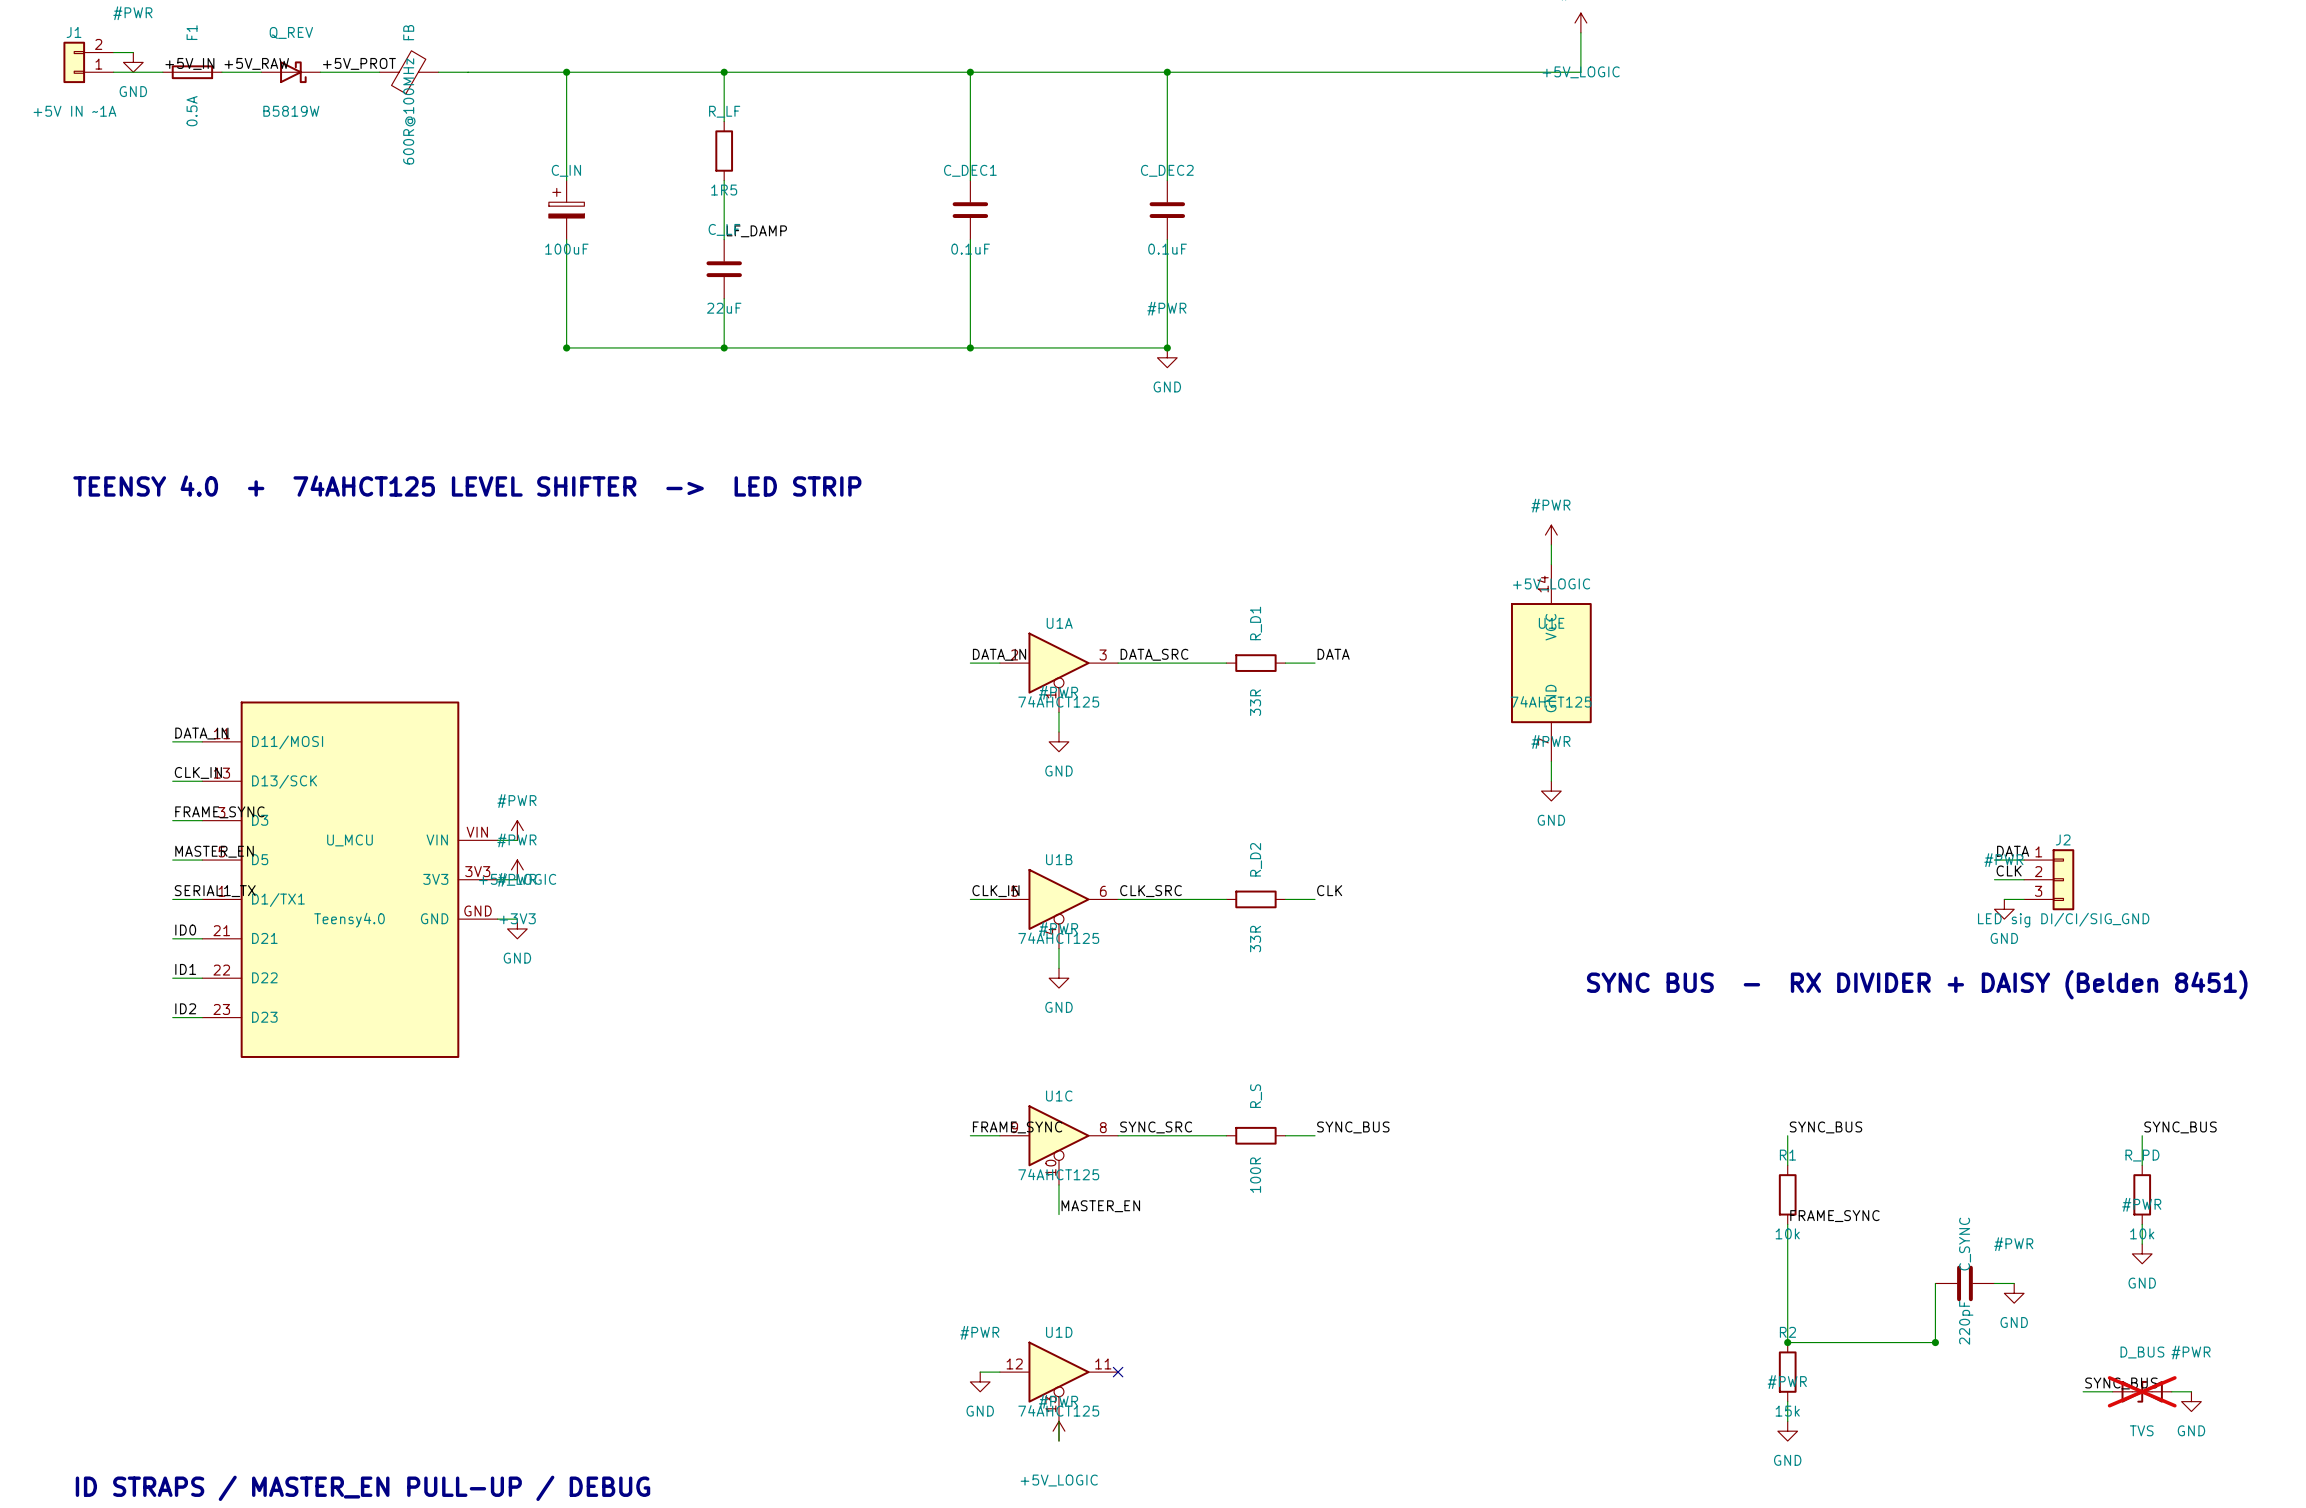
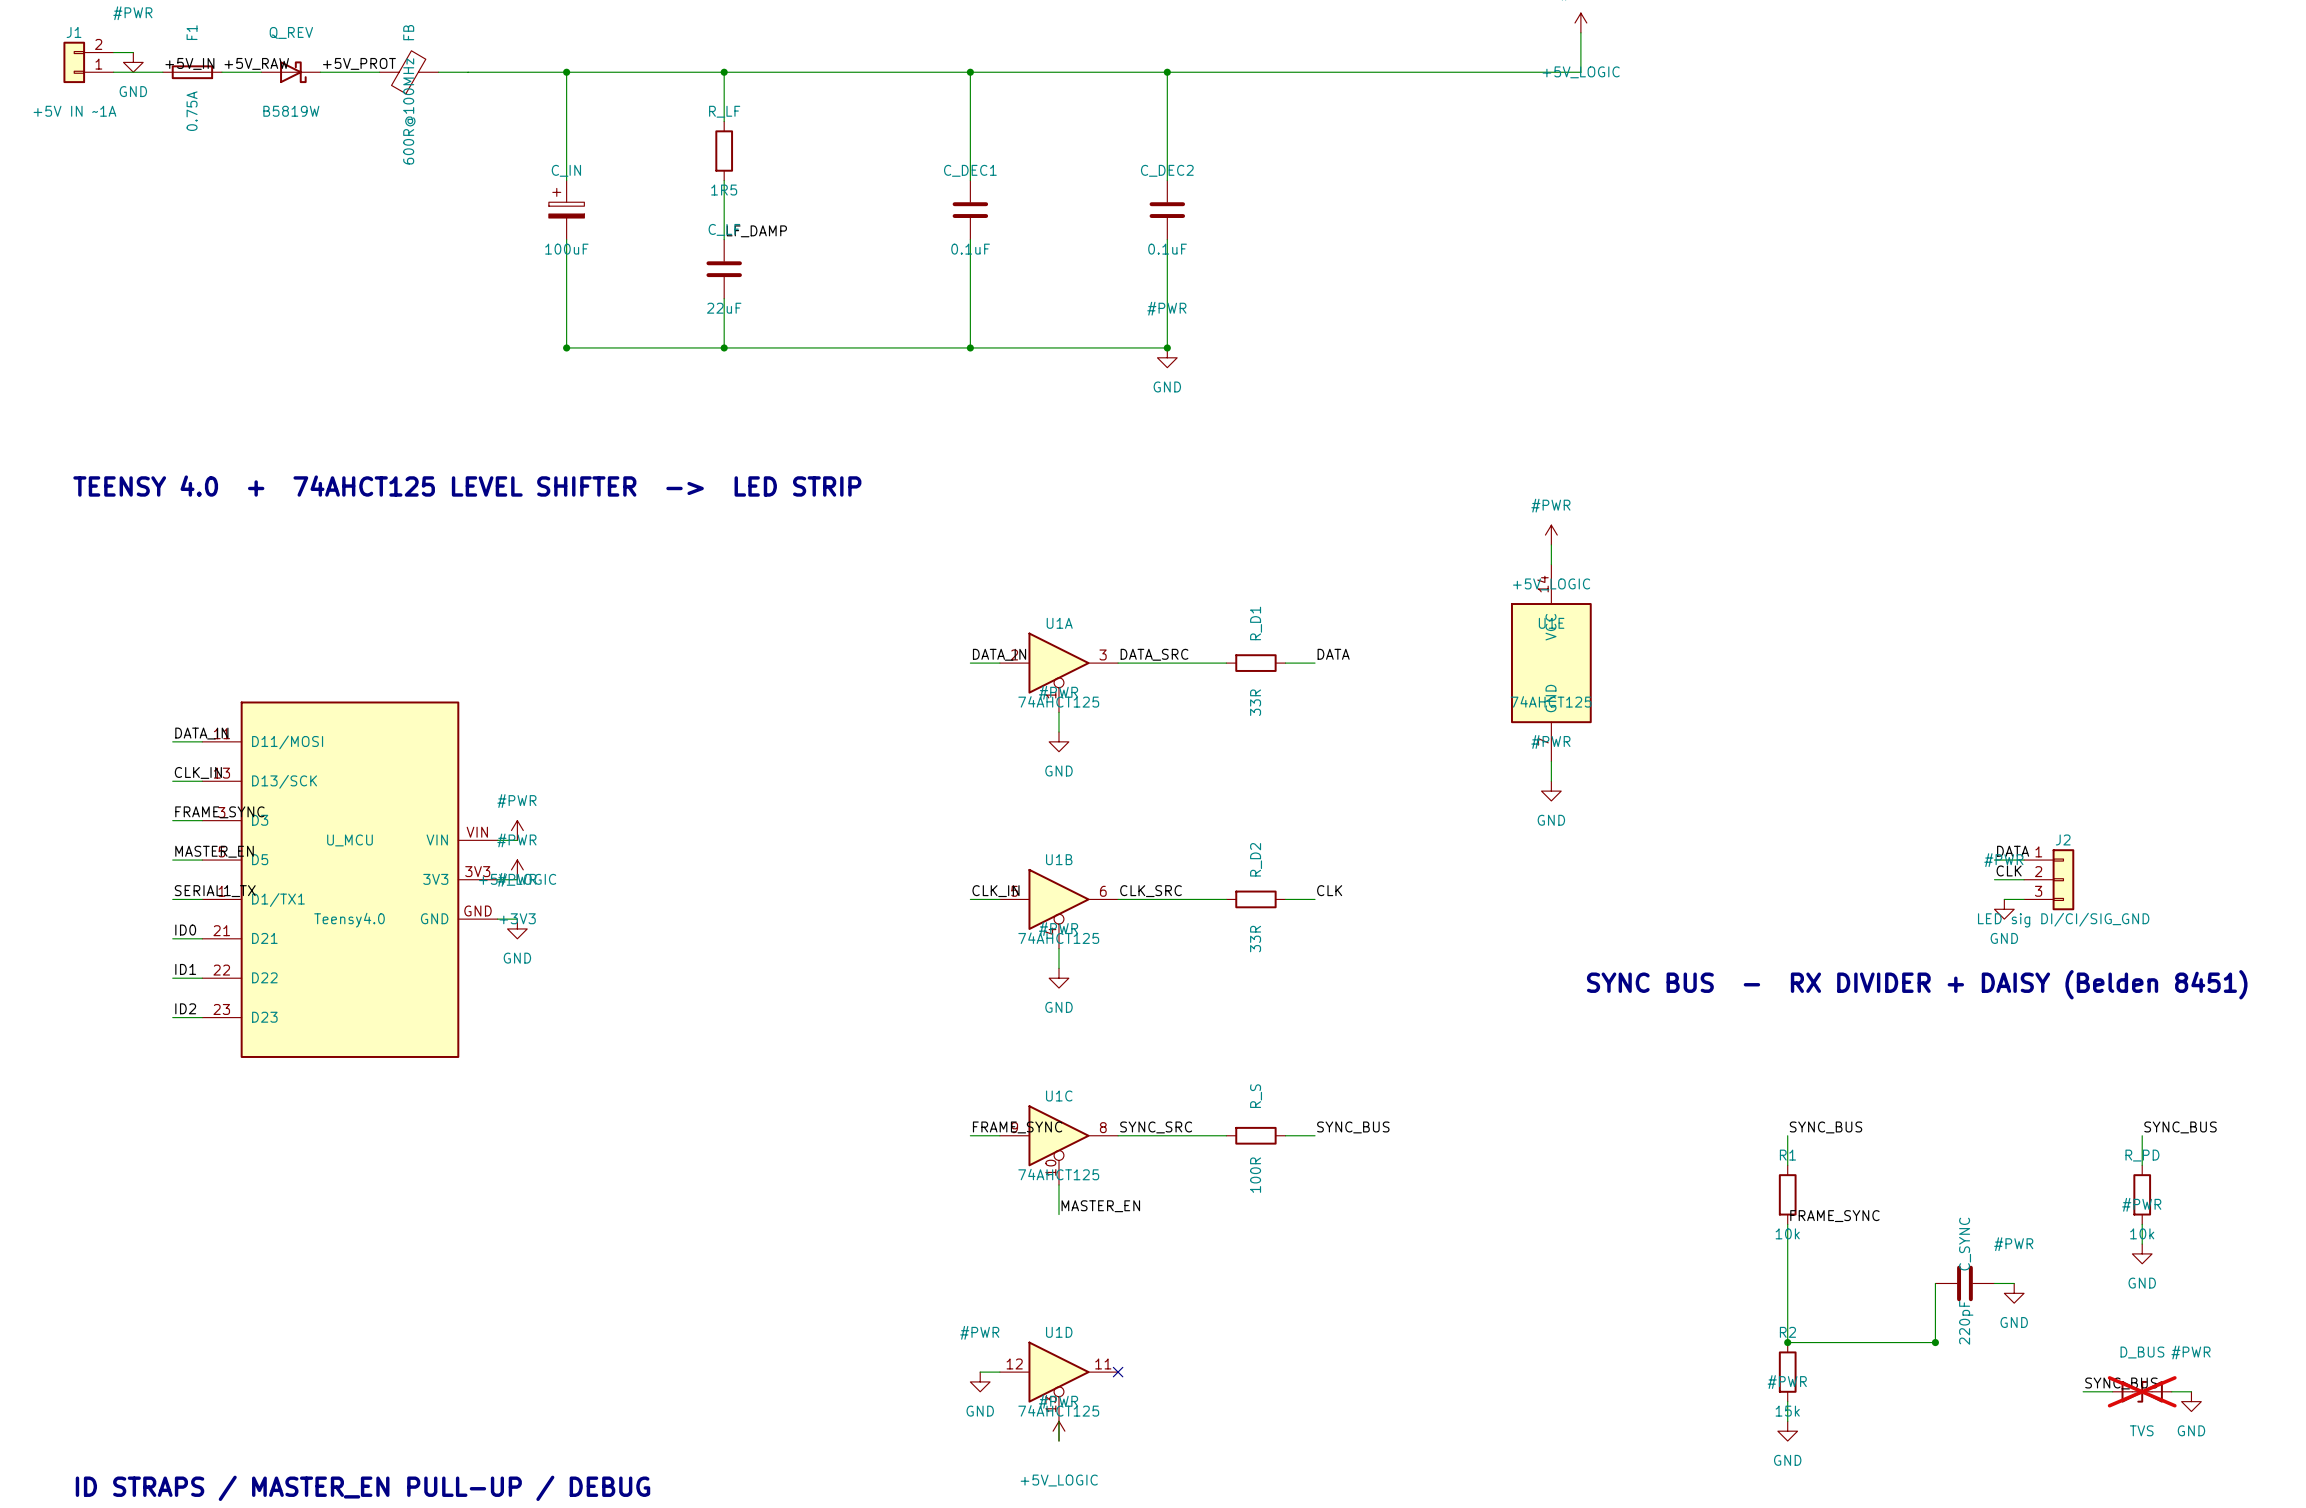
F1 value: 0.5A (192, 111) -> 0.75A (192, 111)

